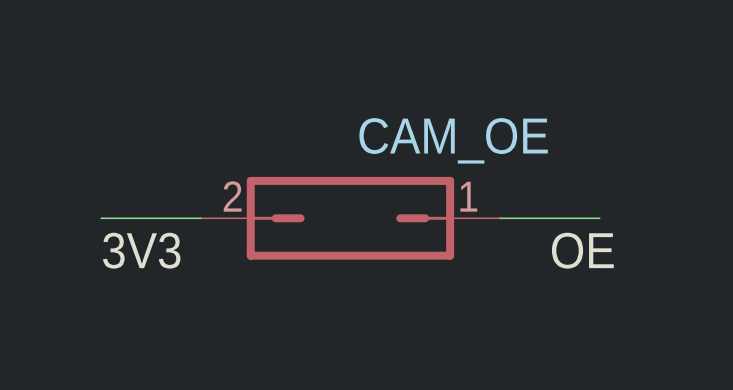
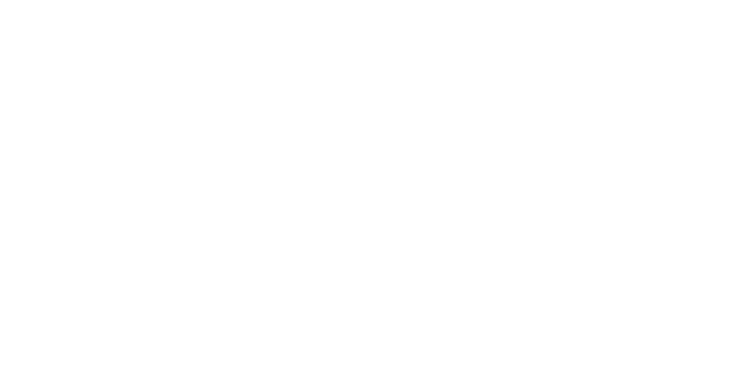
wire: (101, 218) (200, 218) -> none
CAM_OE: (350, 218) -> none
wire: (499, 218) (599, 218) -> none
label: 3V3 (141, 250) -> none
label: OE (582, 250) -> none

